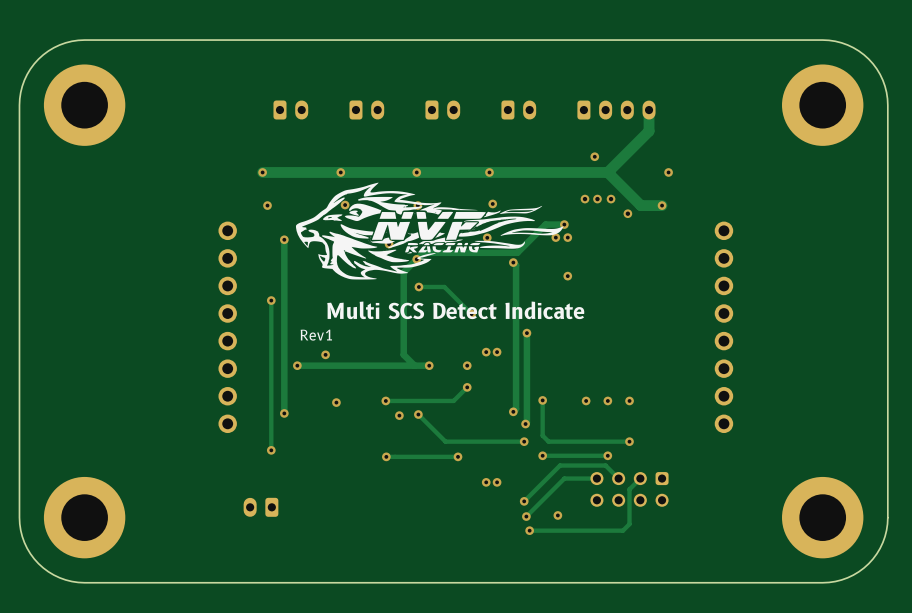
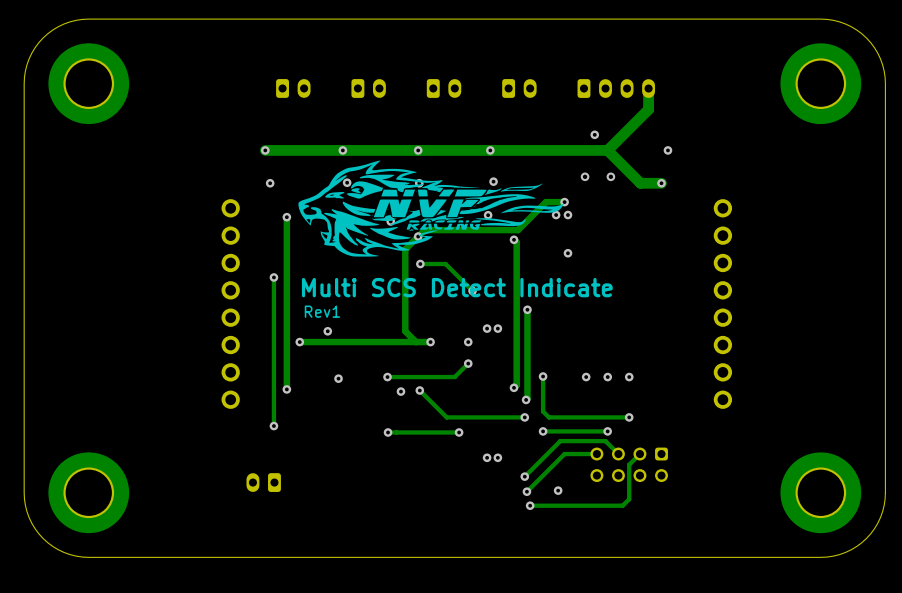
via: (597, 199) -> none
via: (627, 213) -> none

